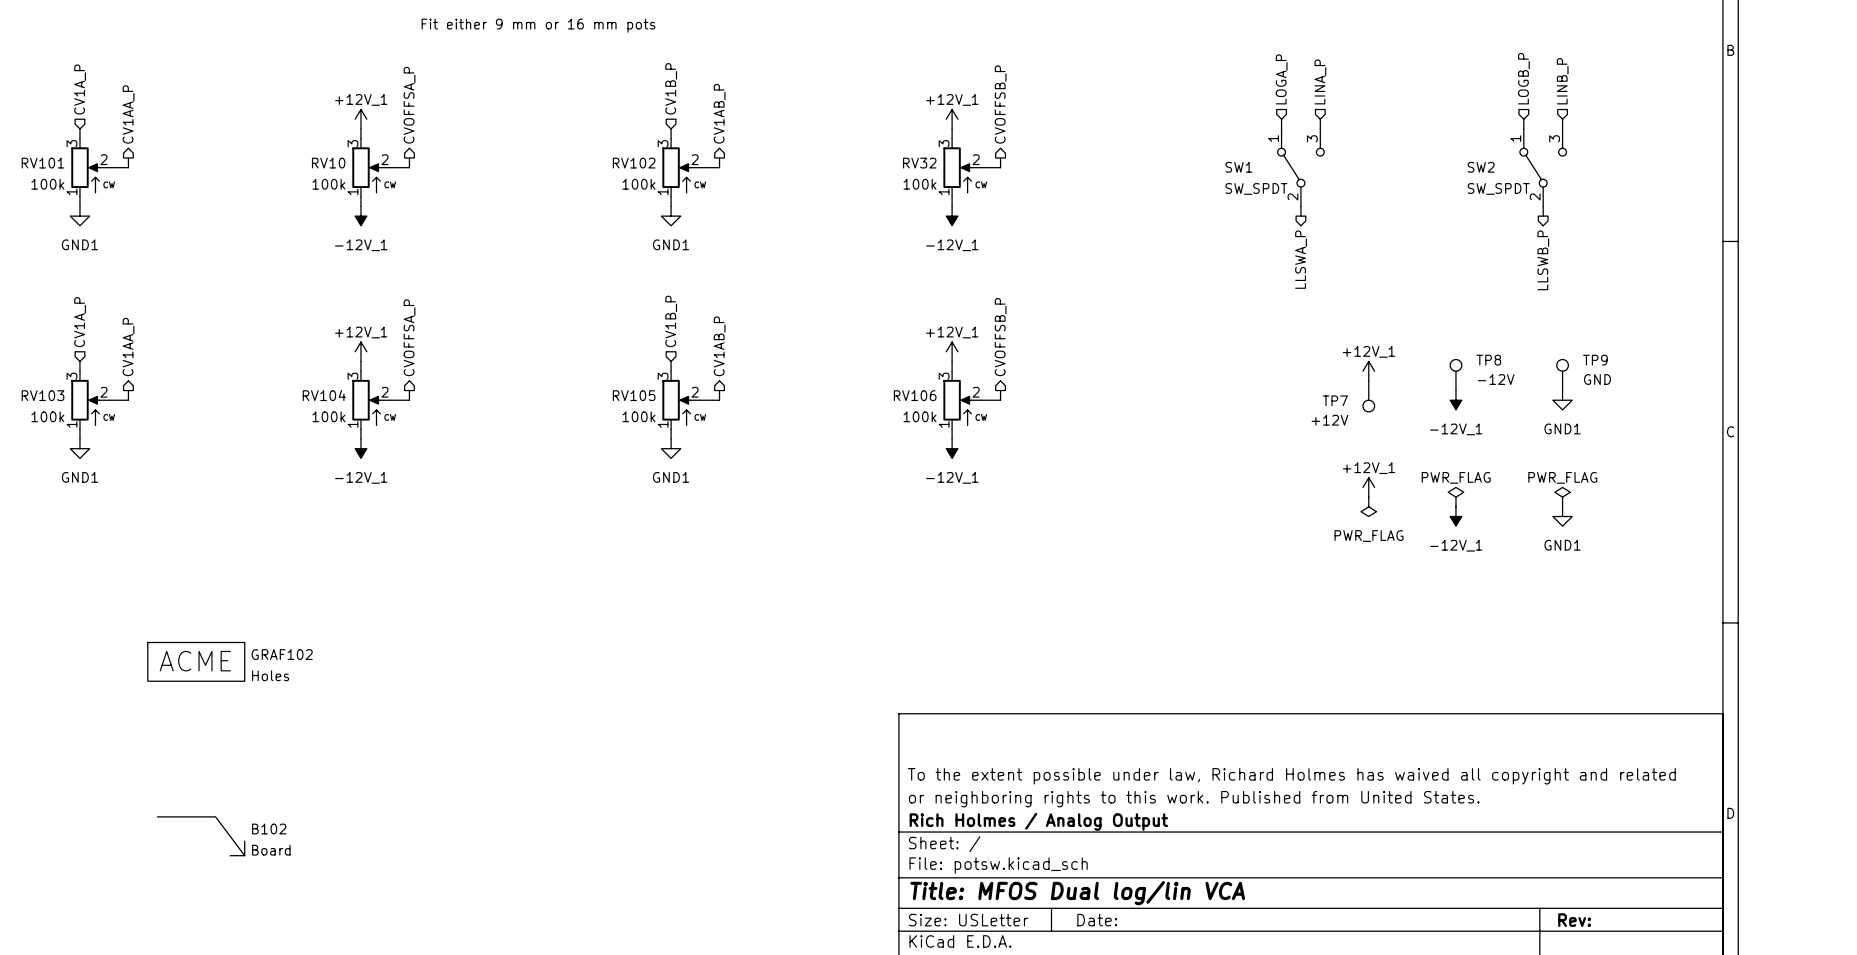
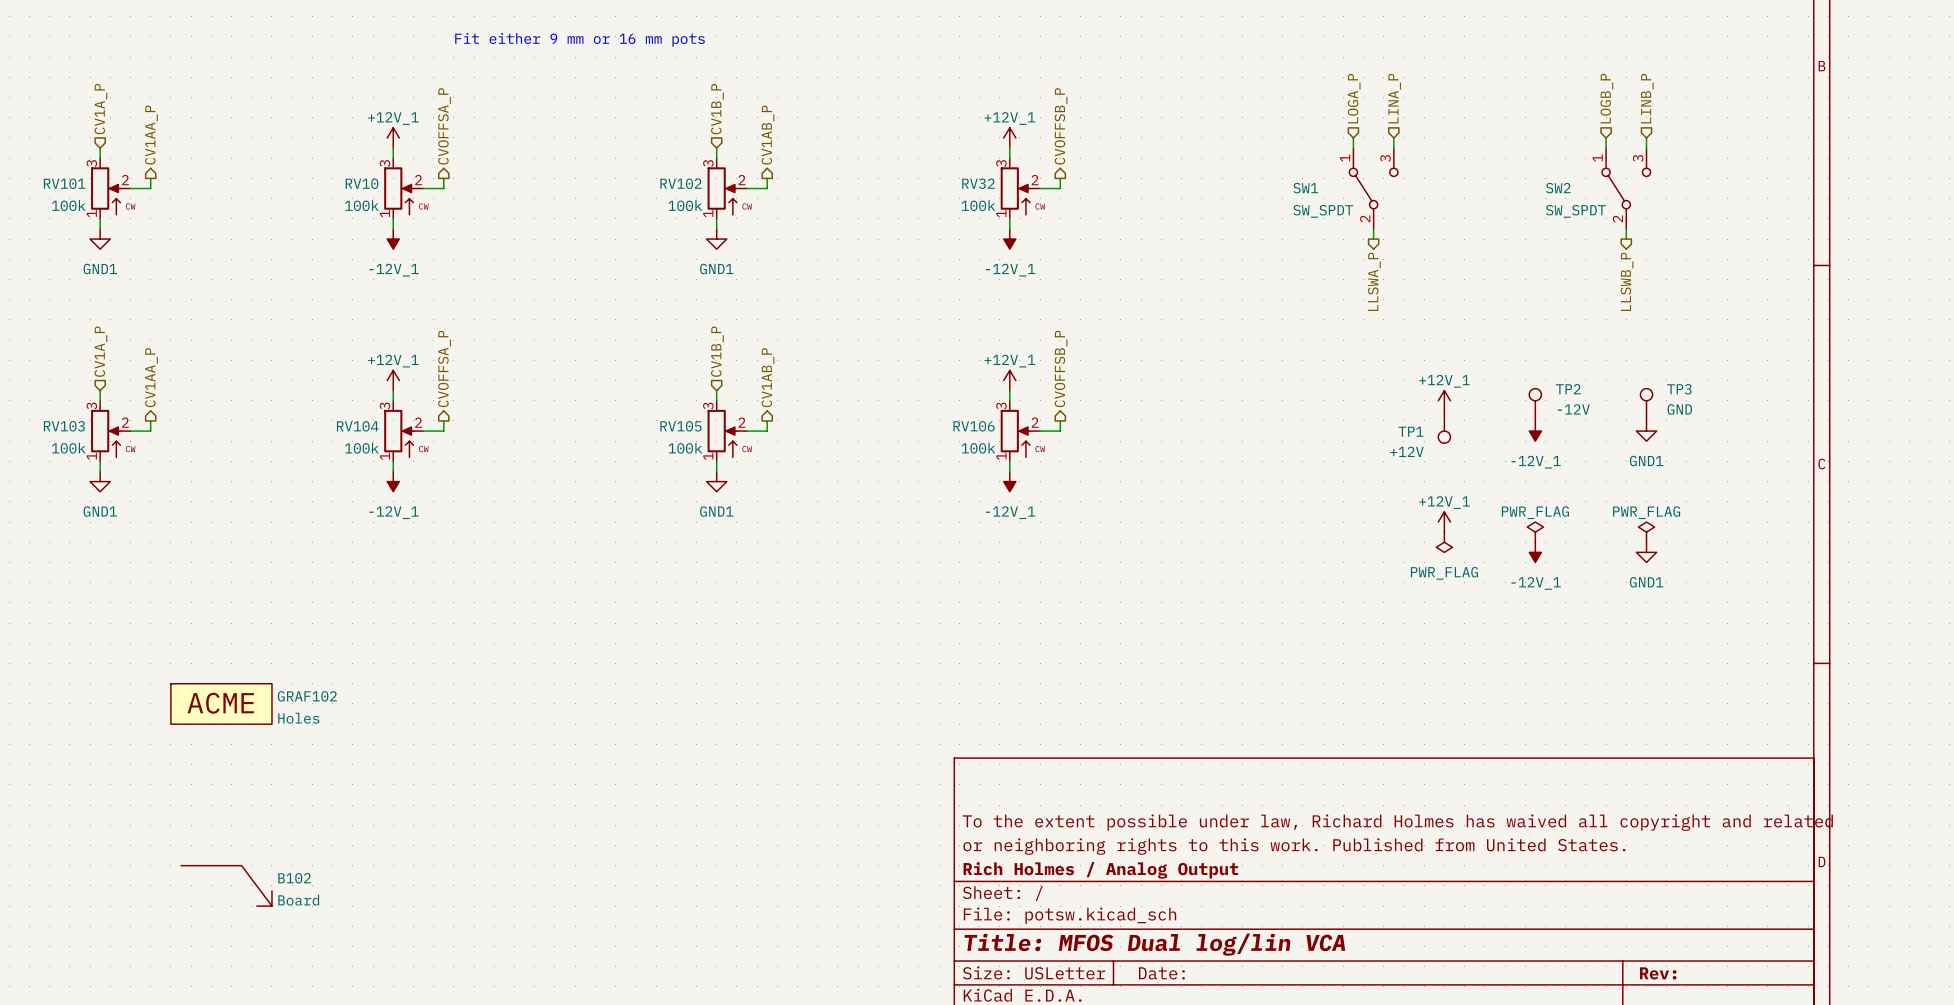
TP8 name: TP8 (1488, 360) -> TP2 (1568, 389)
TP9 name: TP9 (1595, 360) -> TP3 (1679, 389)
TP7 name: TP7 (1335, 400) -> TP1 (1410, 431)

